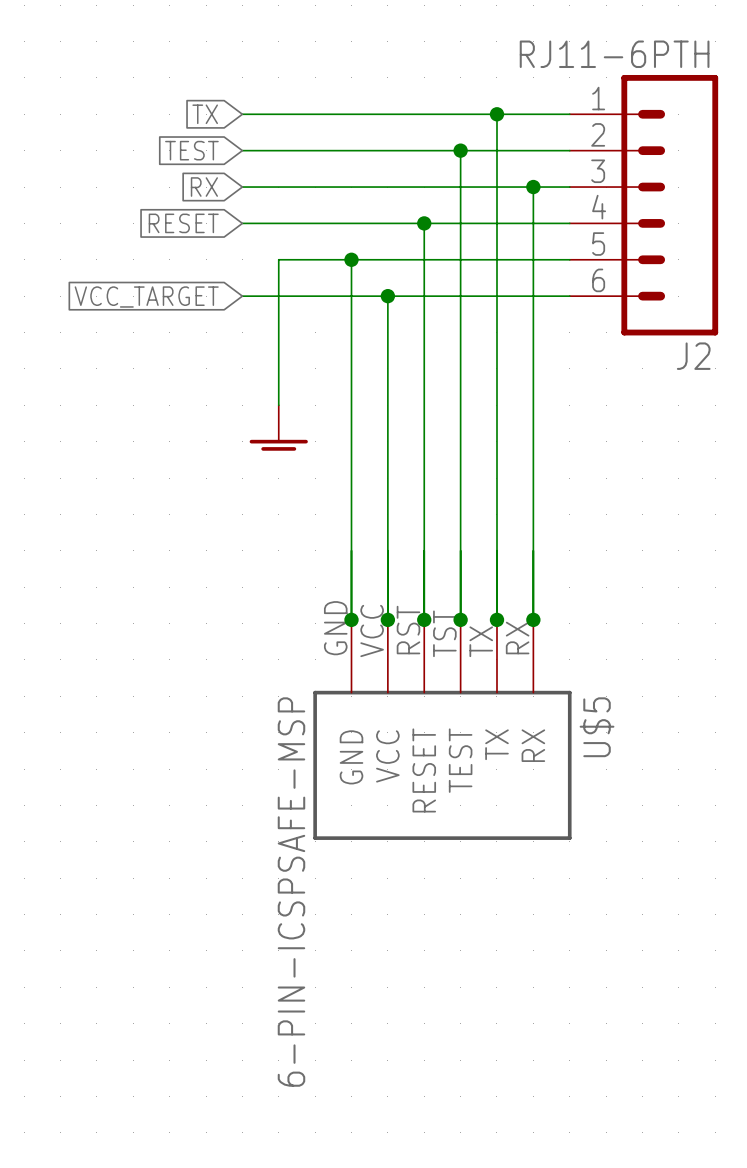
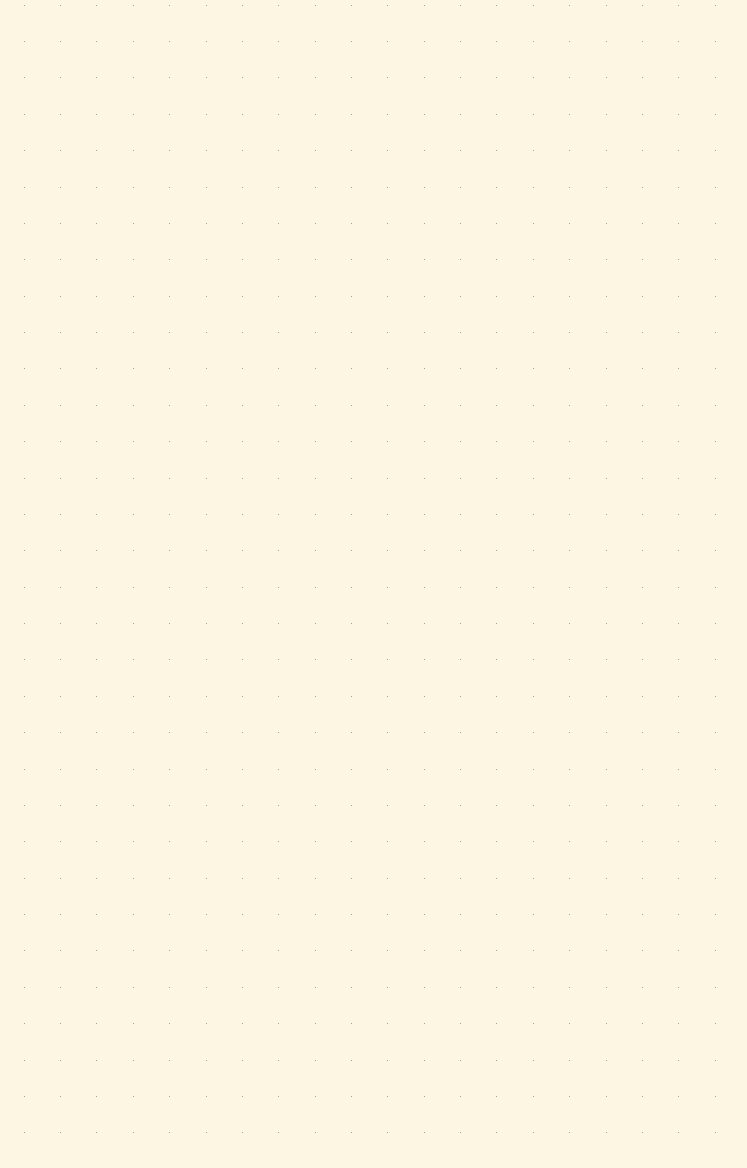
global label: TX (205, 114) -> none
wire: (242, 114) (569, 114) -> none
wire: (496, 114) (496, 619) -> none
junction: (496, 114) -> none
global label: TEST (191, 150) -> none
wire: (242, 150) (569, 150) -> none
wire: (460, 150) (460, 619) -> none
junction: (460, 150) -> none
global label: RX (204, 187) -> none
wire: (242, 187) (569, 187) -> none
wire: (533, 187) (533, 619) -> none
junction: (533, 187) -> none
J2: RJ11-6PTH (643, 205) -> none
global label: RESET (183, 223) -> none
wire: (242, 223) (569, 223) -> none
wire: (424, 223) (424, 619) -> none
junction: (424, 223) -> none
wire: (351, 259) (351, 619) -> none
junction: (351, 259) -> none
wire: (569, 259) (278, 259) (278, 405) -> none
wire: (242, 296) (569, 296) -> none
wire: (387, 296) (387, 619) -> none
junction: (387, 296) -> none
global label: VCC_TARGET (146, 297) -> none
power symbol: (278, 428) -> none
junction: (351, 619) -> none
junction: (387, 619) -> none
junction: (424, 619) -> none
junction: (460, 619) -> none
junction: (496, 619) -> none
junction: (533, 619) -> none
U$5: 6-PIN-ICSPSAFE-MSP (442, 729) -> none

